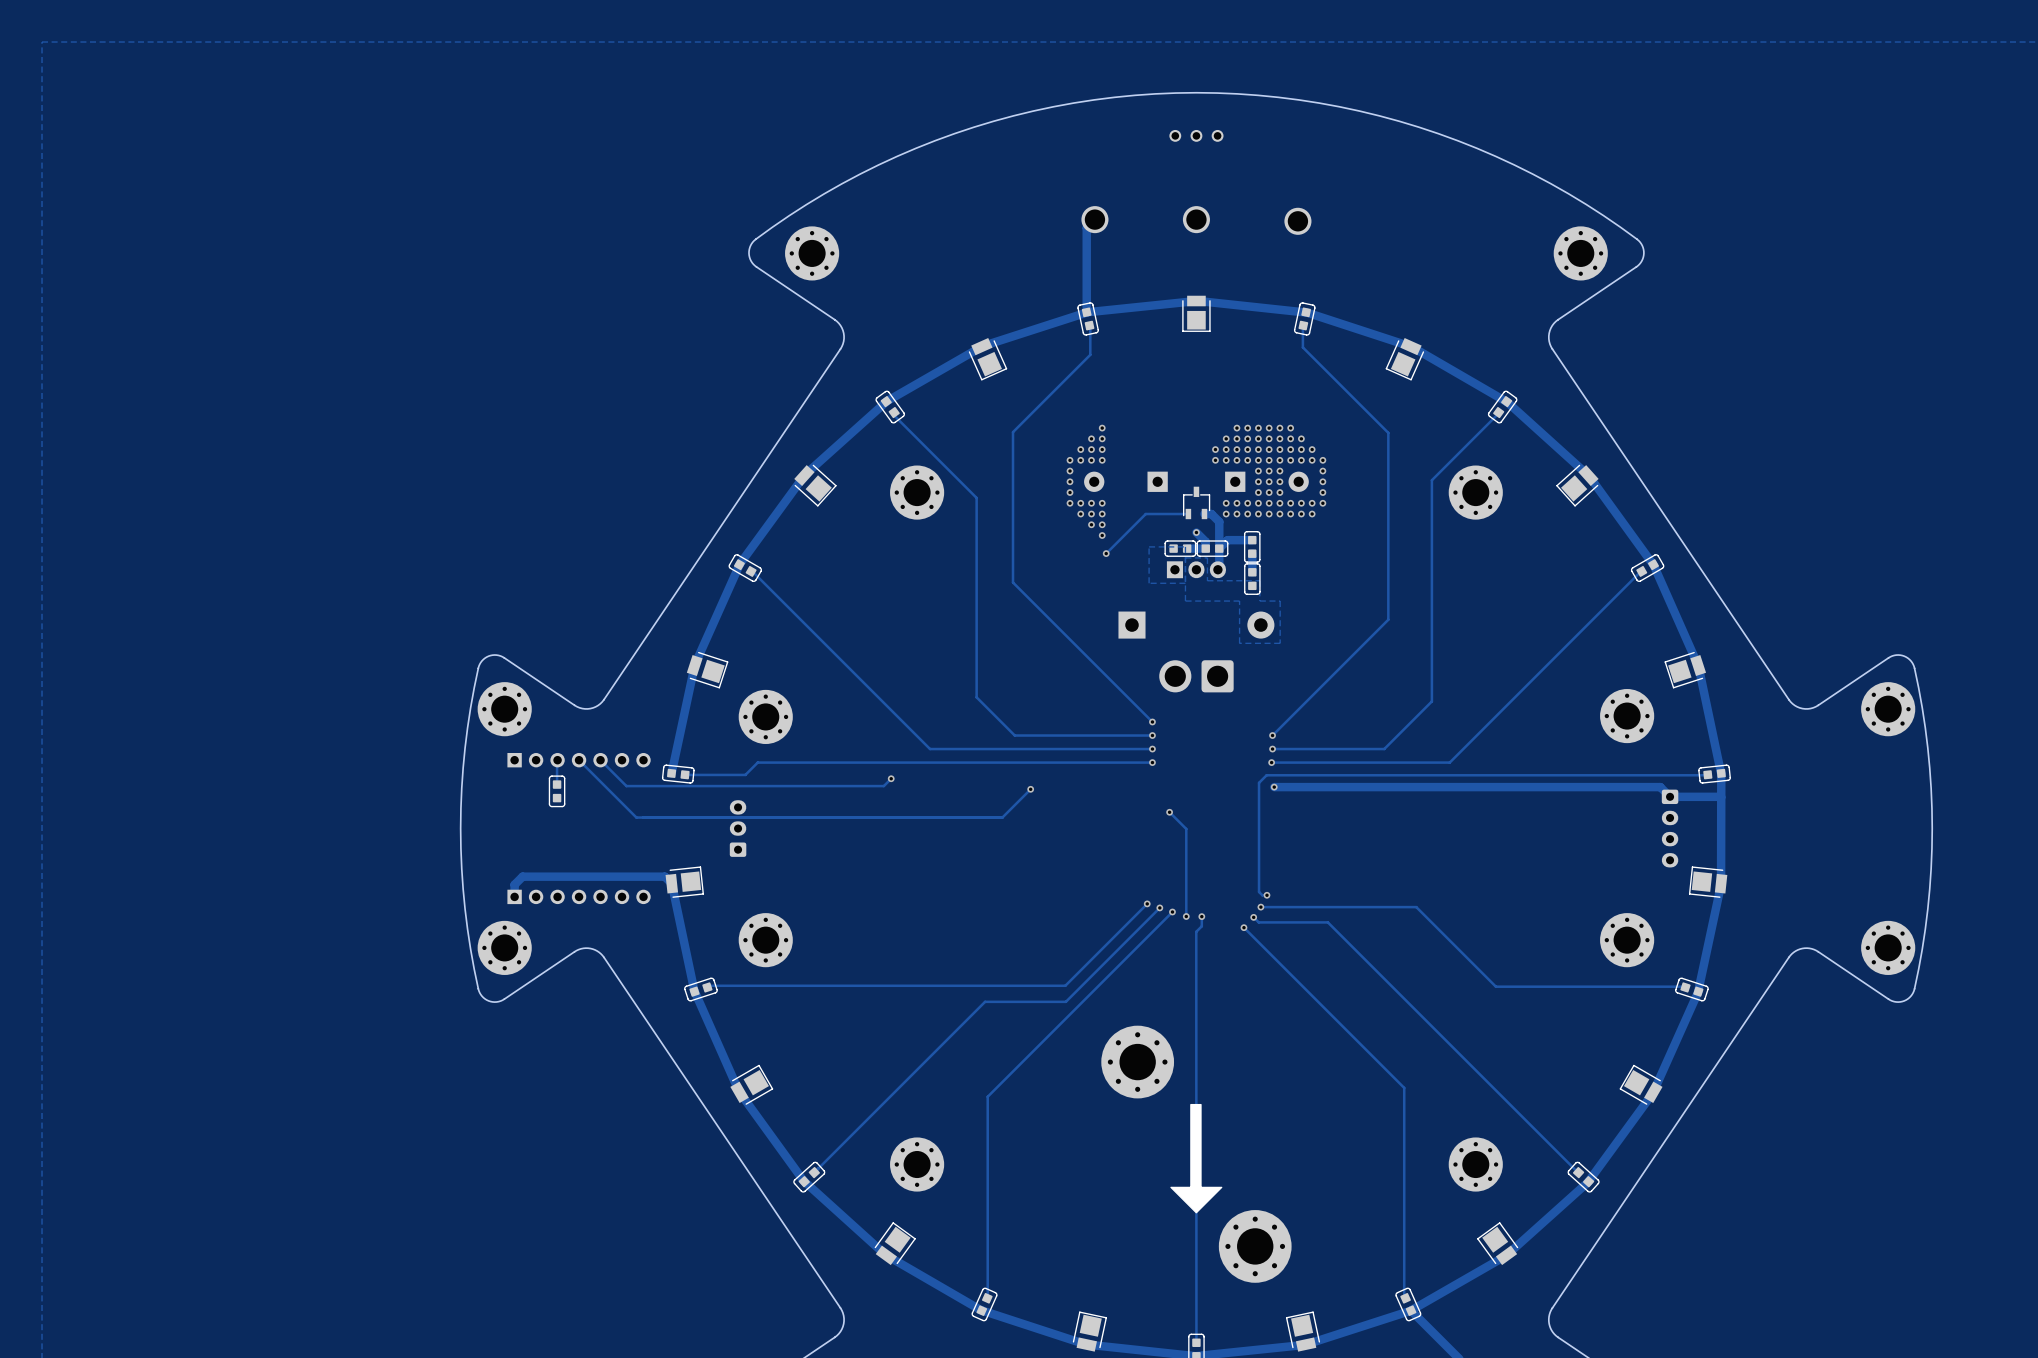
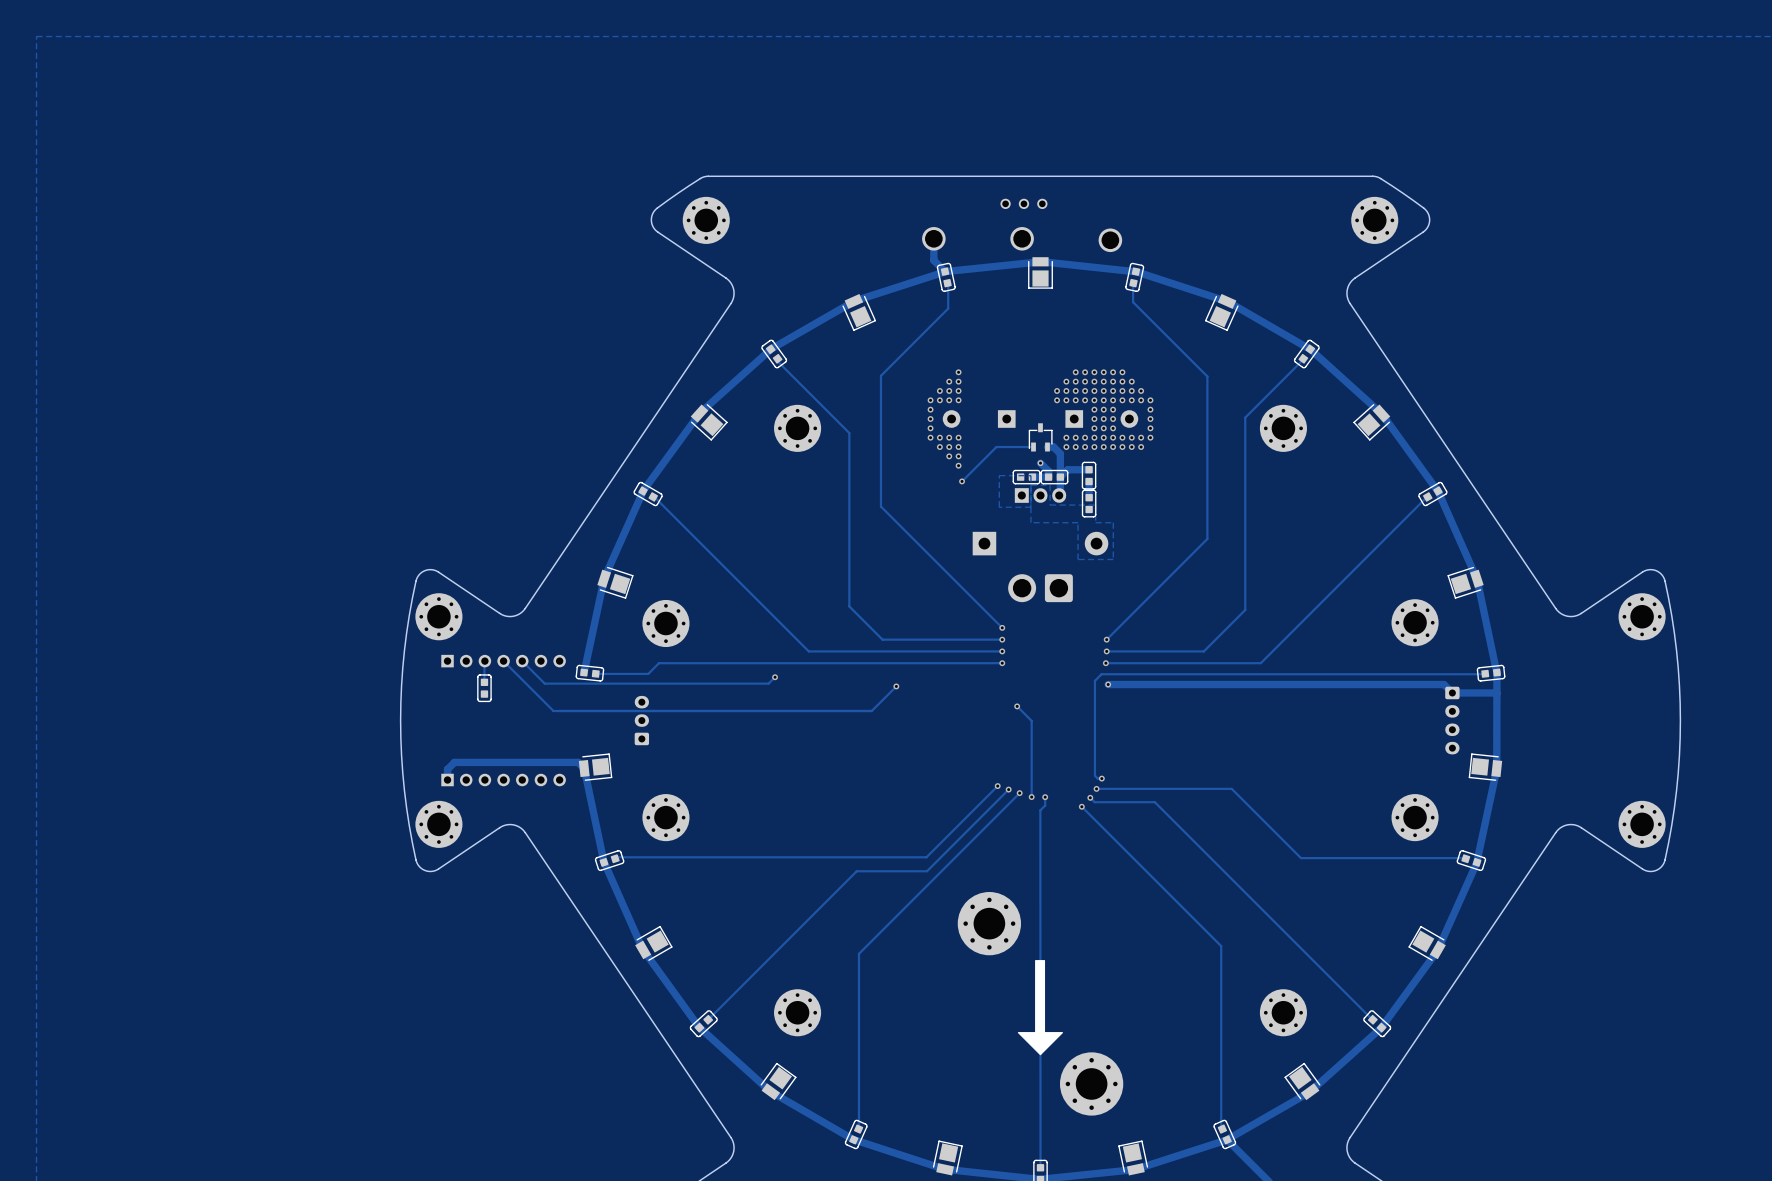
part position: (1196, 135) -> (1023, 203)
track: (1094, 219) (1086, 227) (1086, 312) -> (933, 238) (933, 260) (945, 271)
part: (1094, 219) -> none
part: (1196, 219) -> none
part: (1297, 221) -> none
board edge: (1637, 239) (1586, 204) (1550, 183) (1495, 156) (1438, 133) (1379, 115) (1319, 103) (1258, 95) (1196, 92) (1155, 93) (1094, 99) (1033, 111) (974, 127) (916, 148) (860, 174) (806, 204) (755, 239) -> (1423, 208) (1380, 178) (1372, 176) (708, 176) (700, 178) (657, 208)
part: none -> (933, 238)
part: none -> (1022, 238)
part: none -> (1110, 240)

